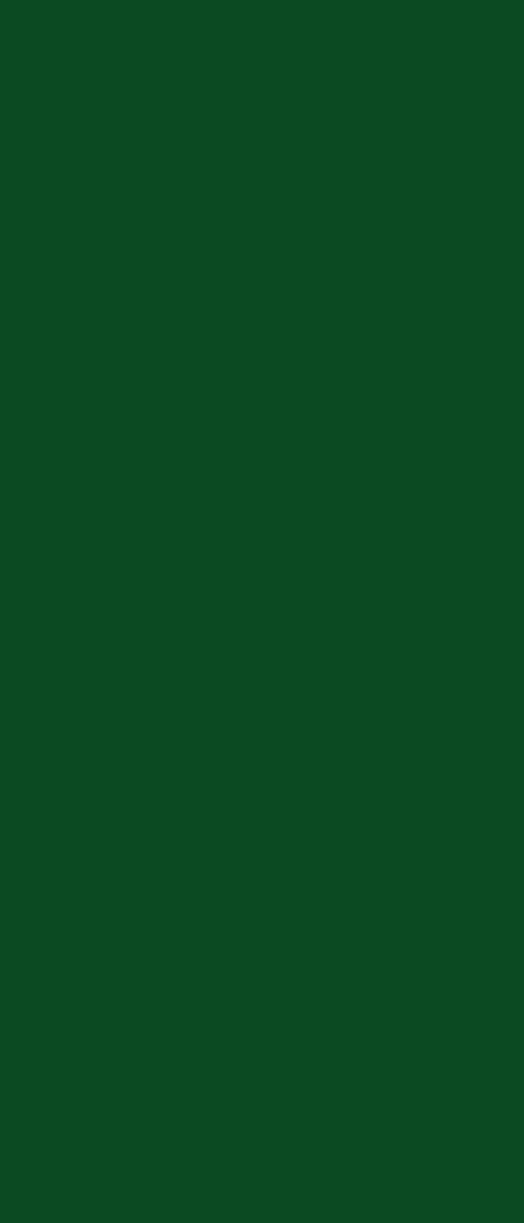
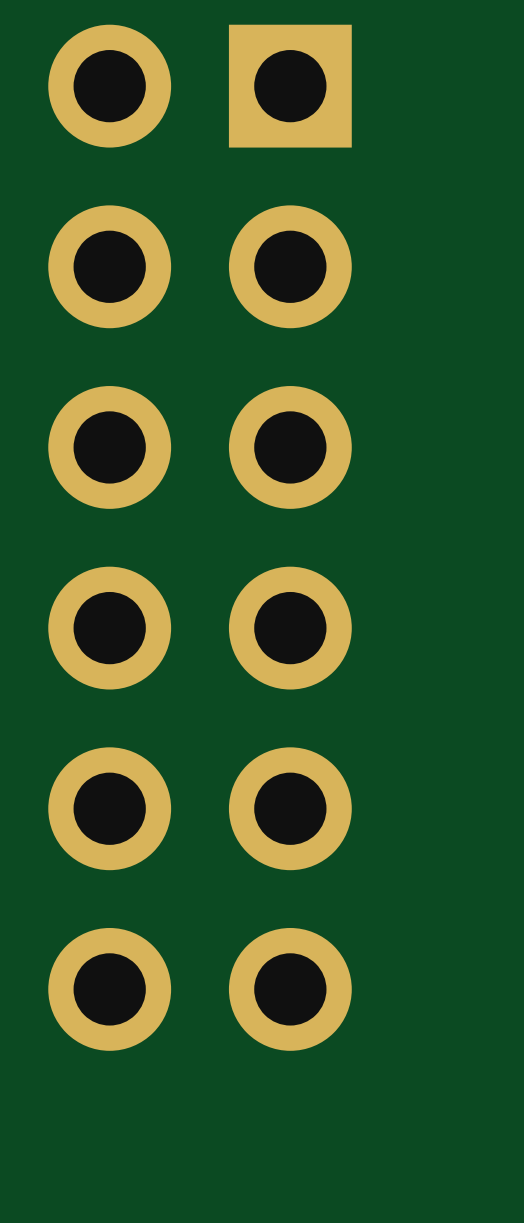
part: none -> (200, 537)

